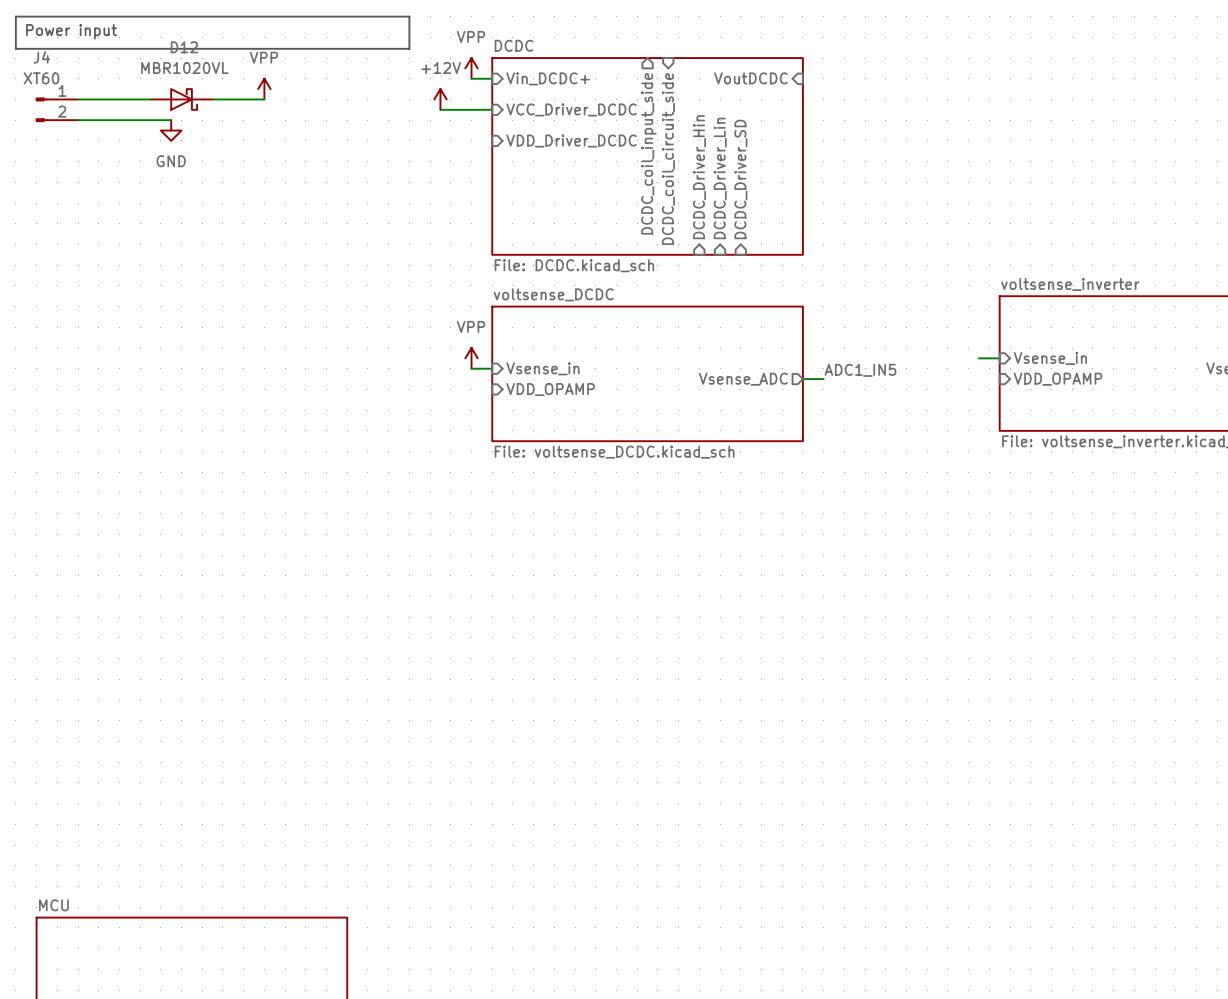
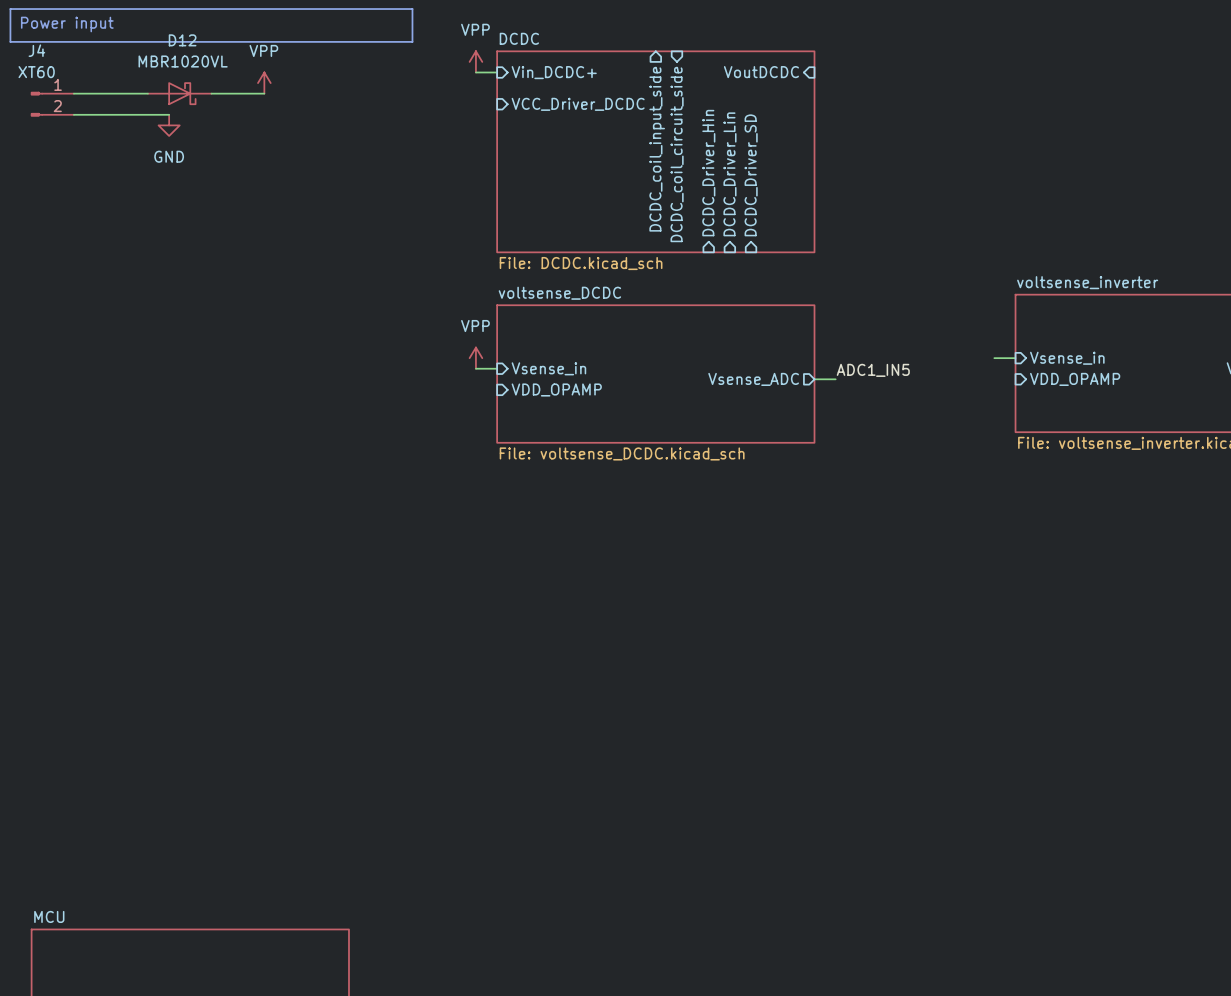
power symbol: +12V (440, 99) -> none
wire: (440, 109) (492, 109) -> none
sheet pin: VDD_Driver_DCDC (571, 140) -> none

